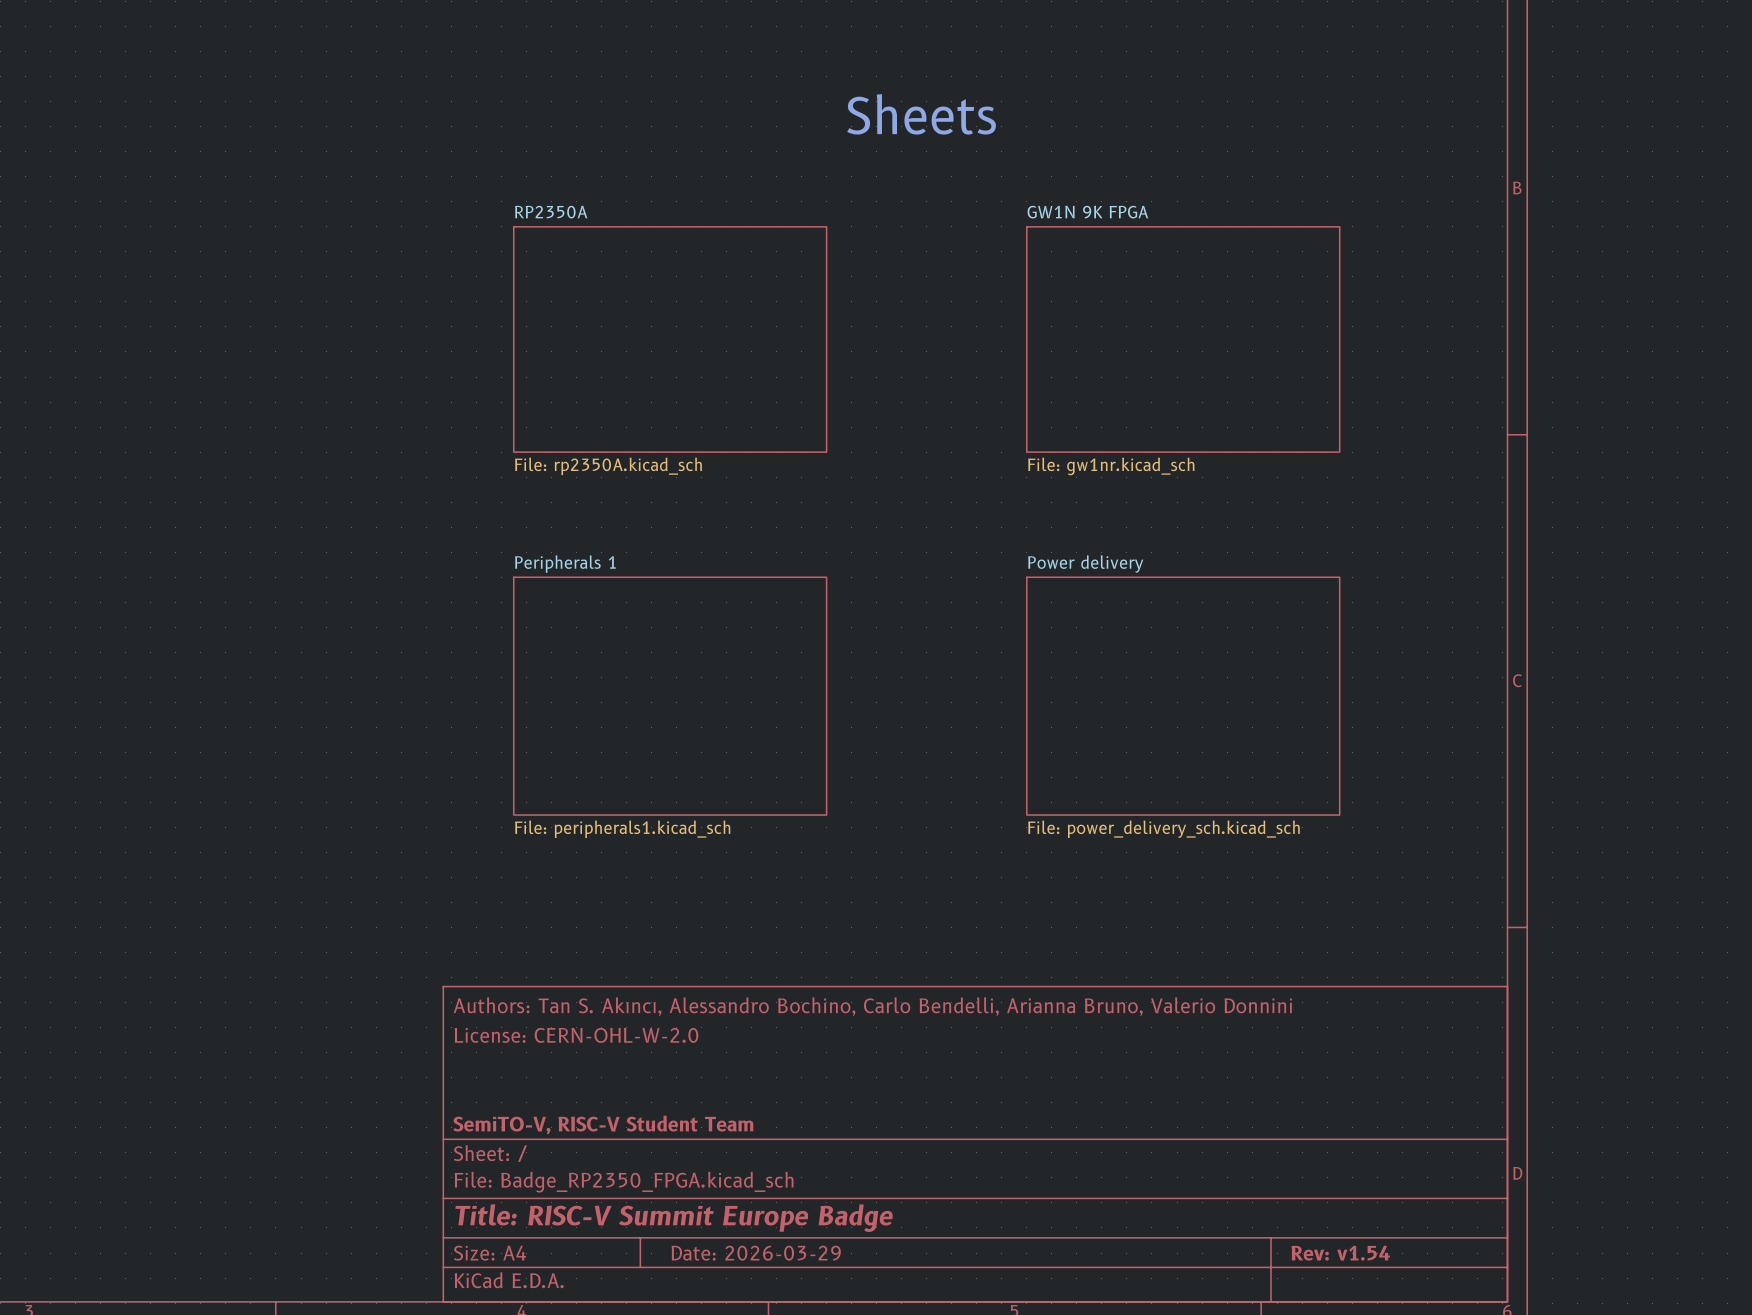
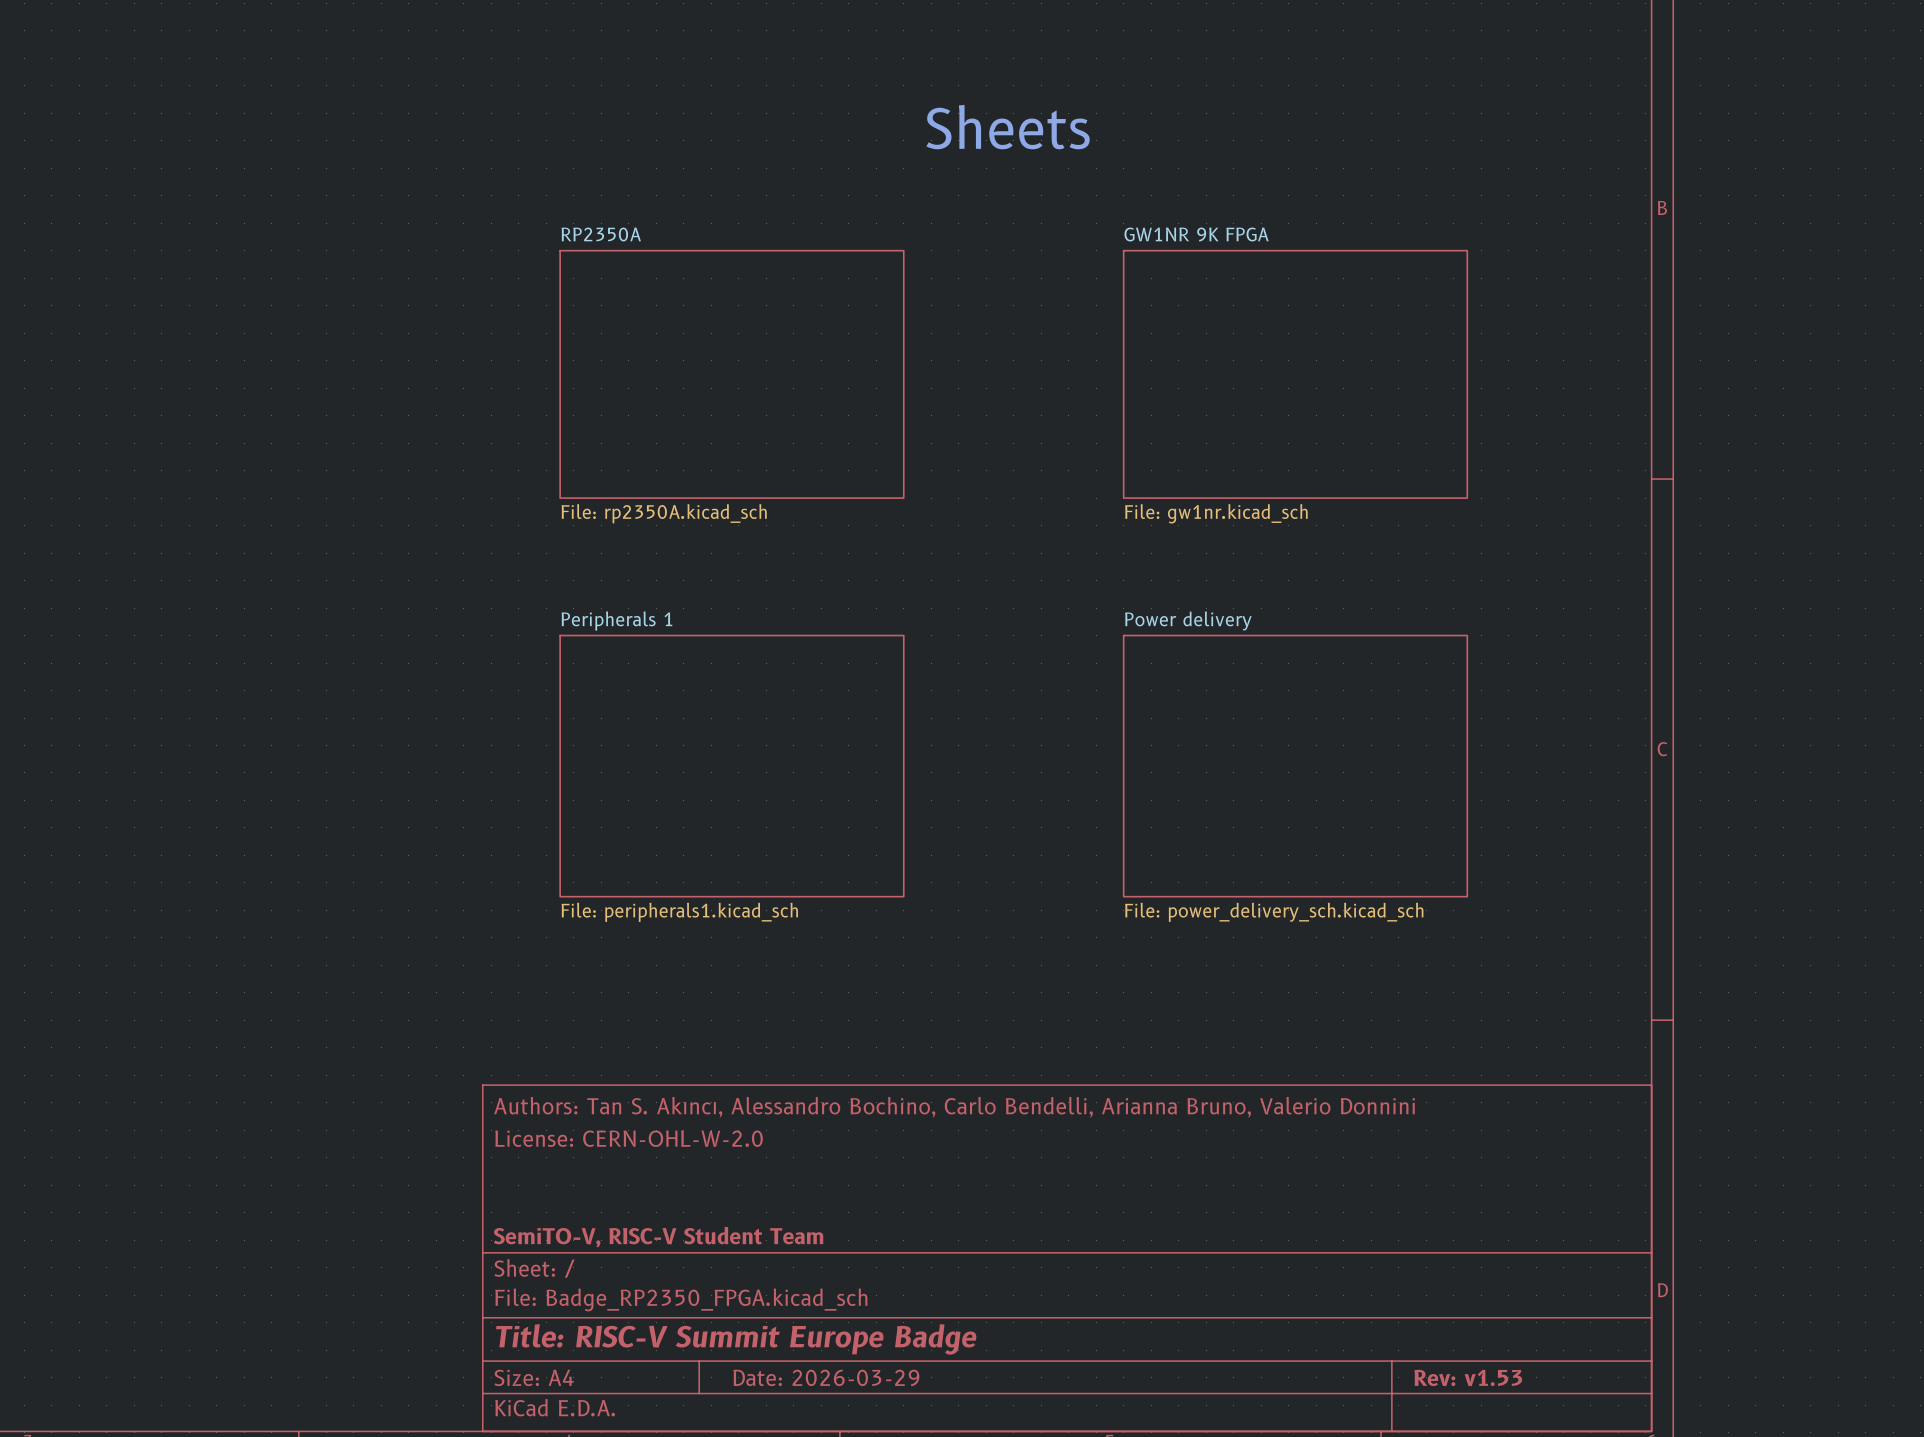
sheet GW1N 9K FPGA name: GW1N 9K FPGA (1087, 212) -> GW1NR 9K FPGA (1196, 234)
title block: Rev: v1.54 (1340, 1253) -> Rev: v1.53 (1468, 1377)

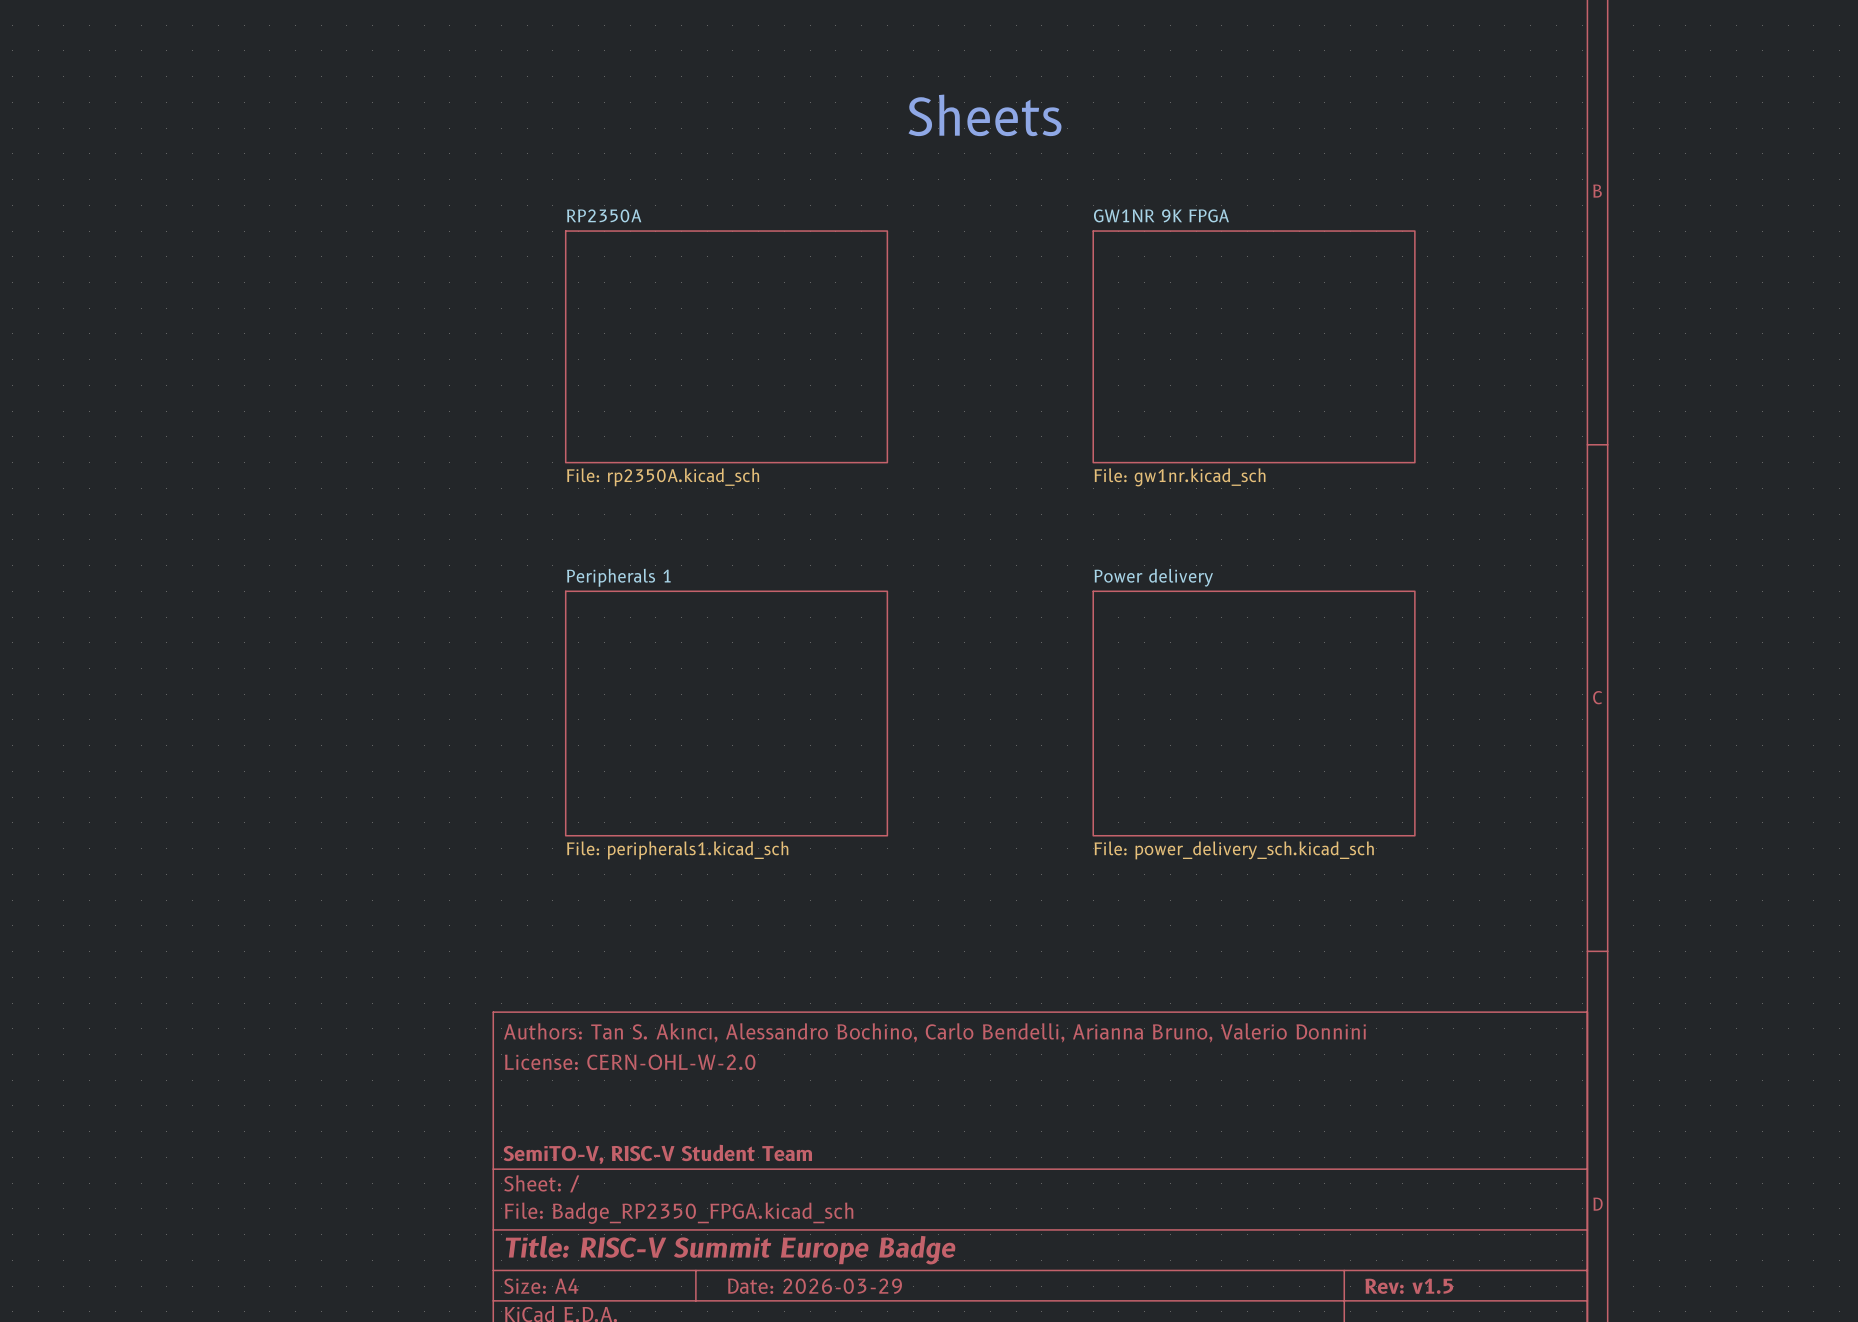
title block: Rev: v1.53 (1468, 1377) -> Rev: v1.5 (1409, 1286)

